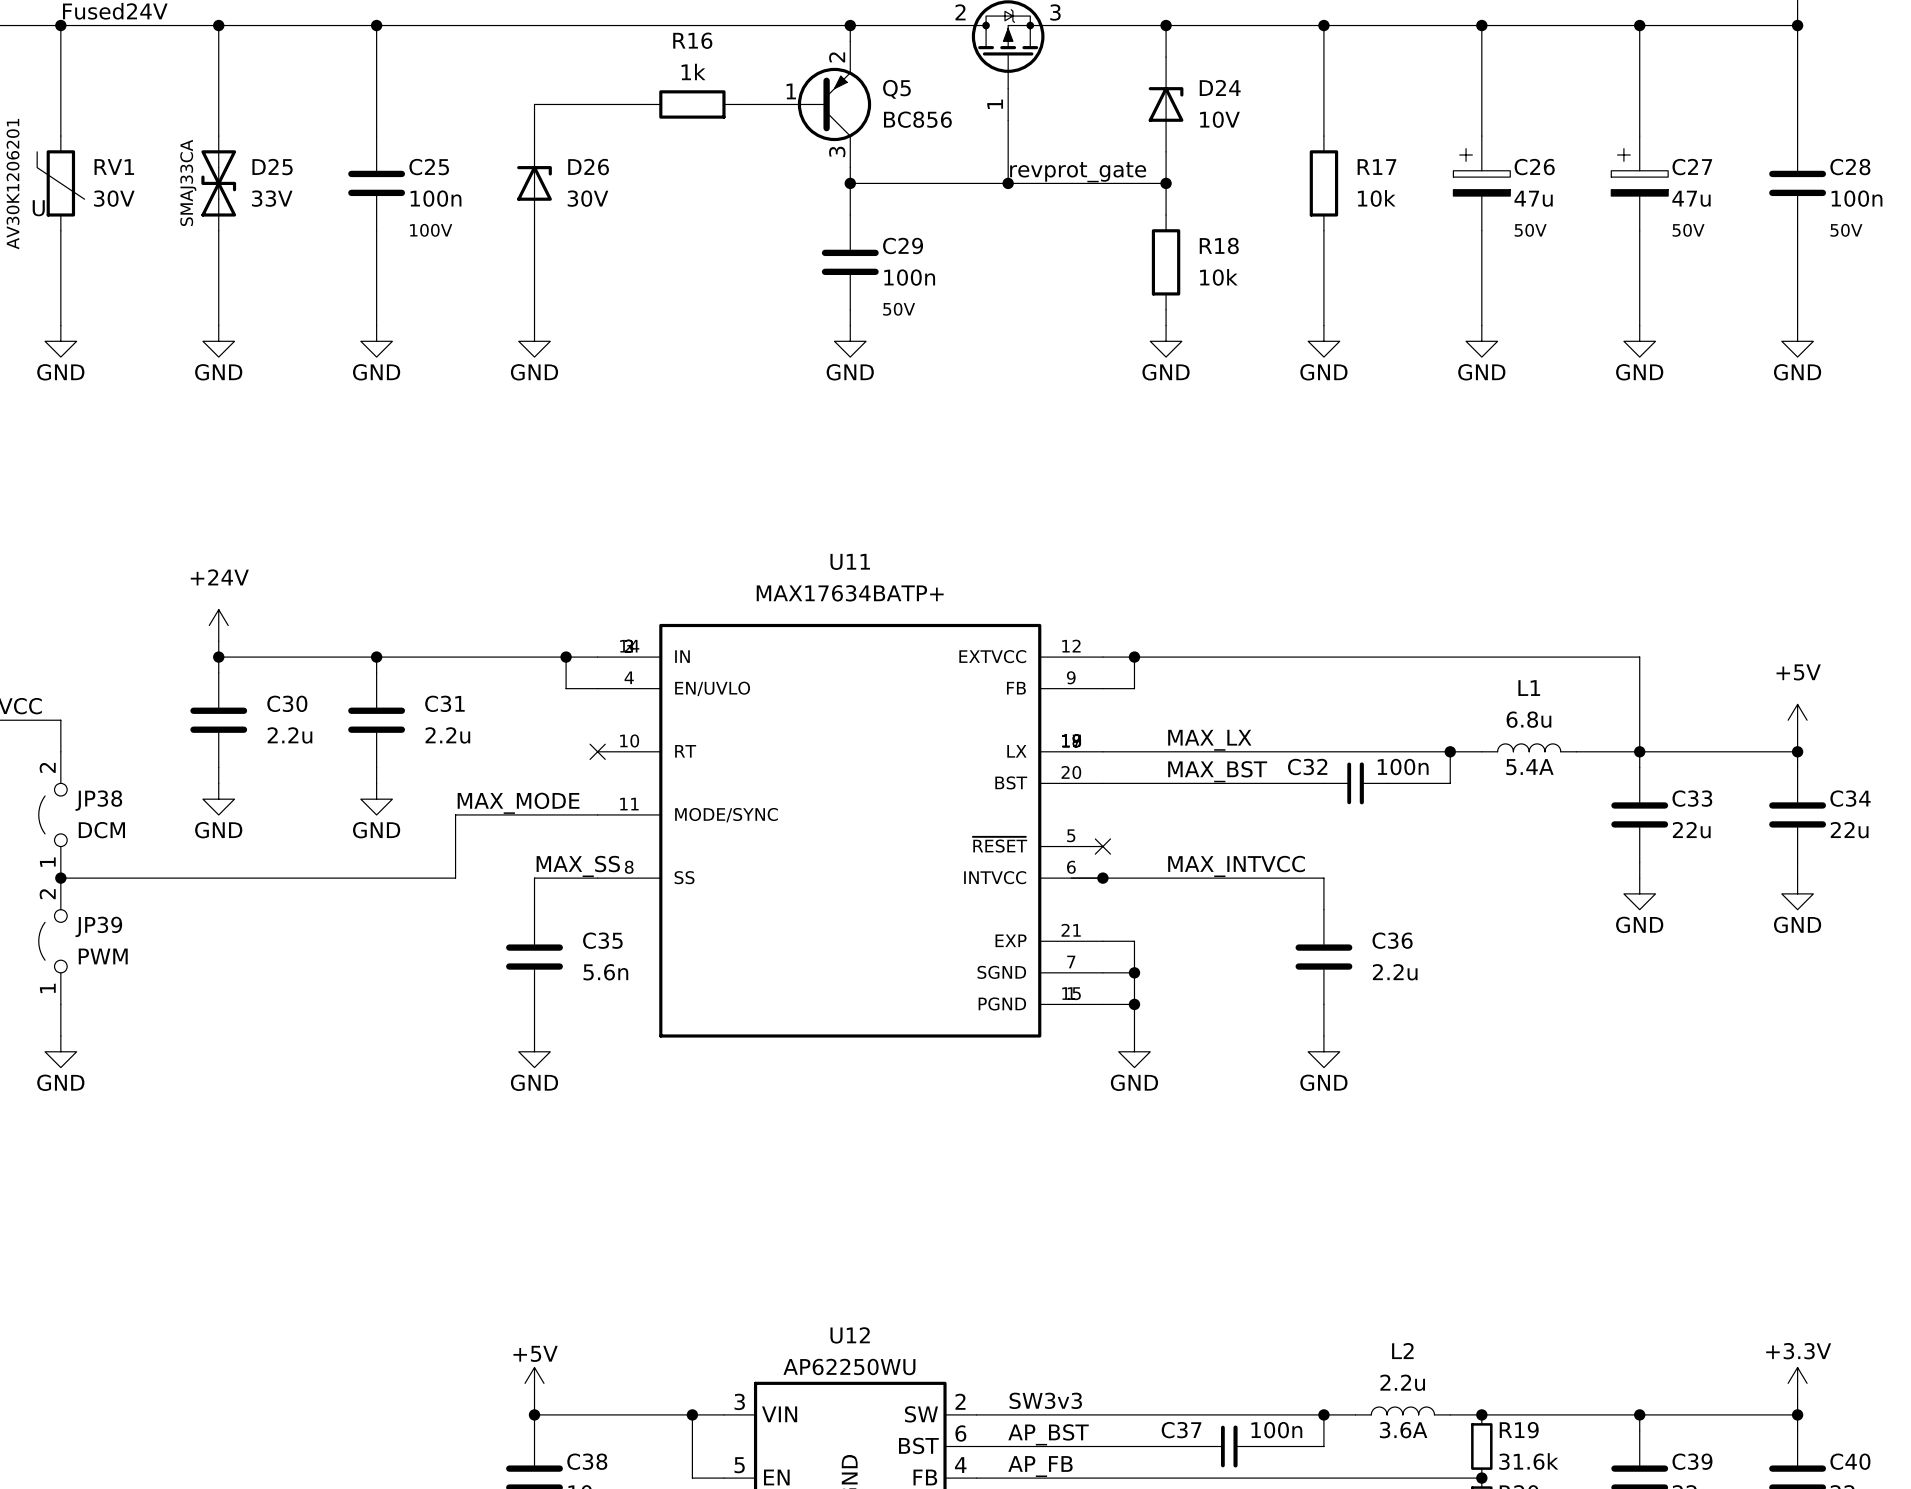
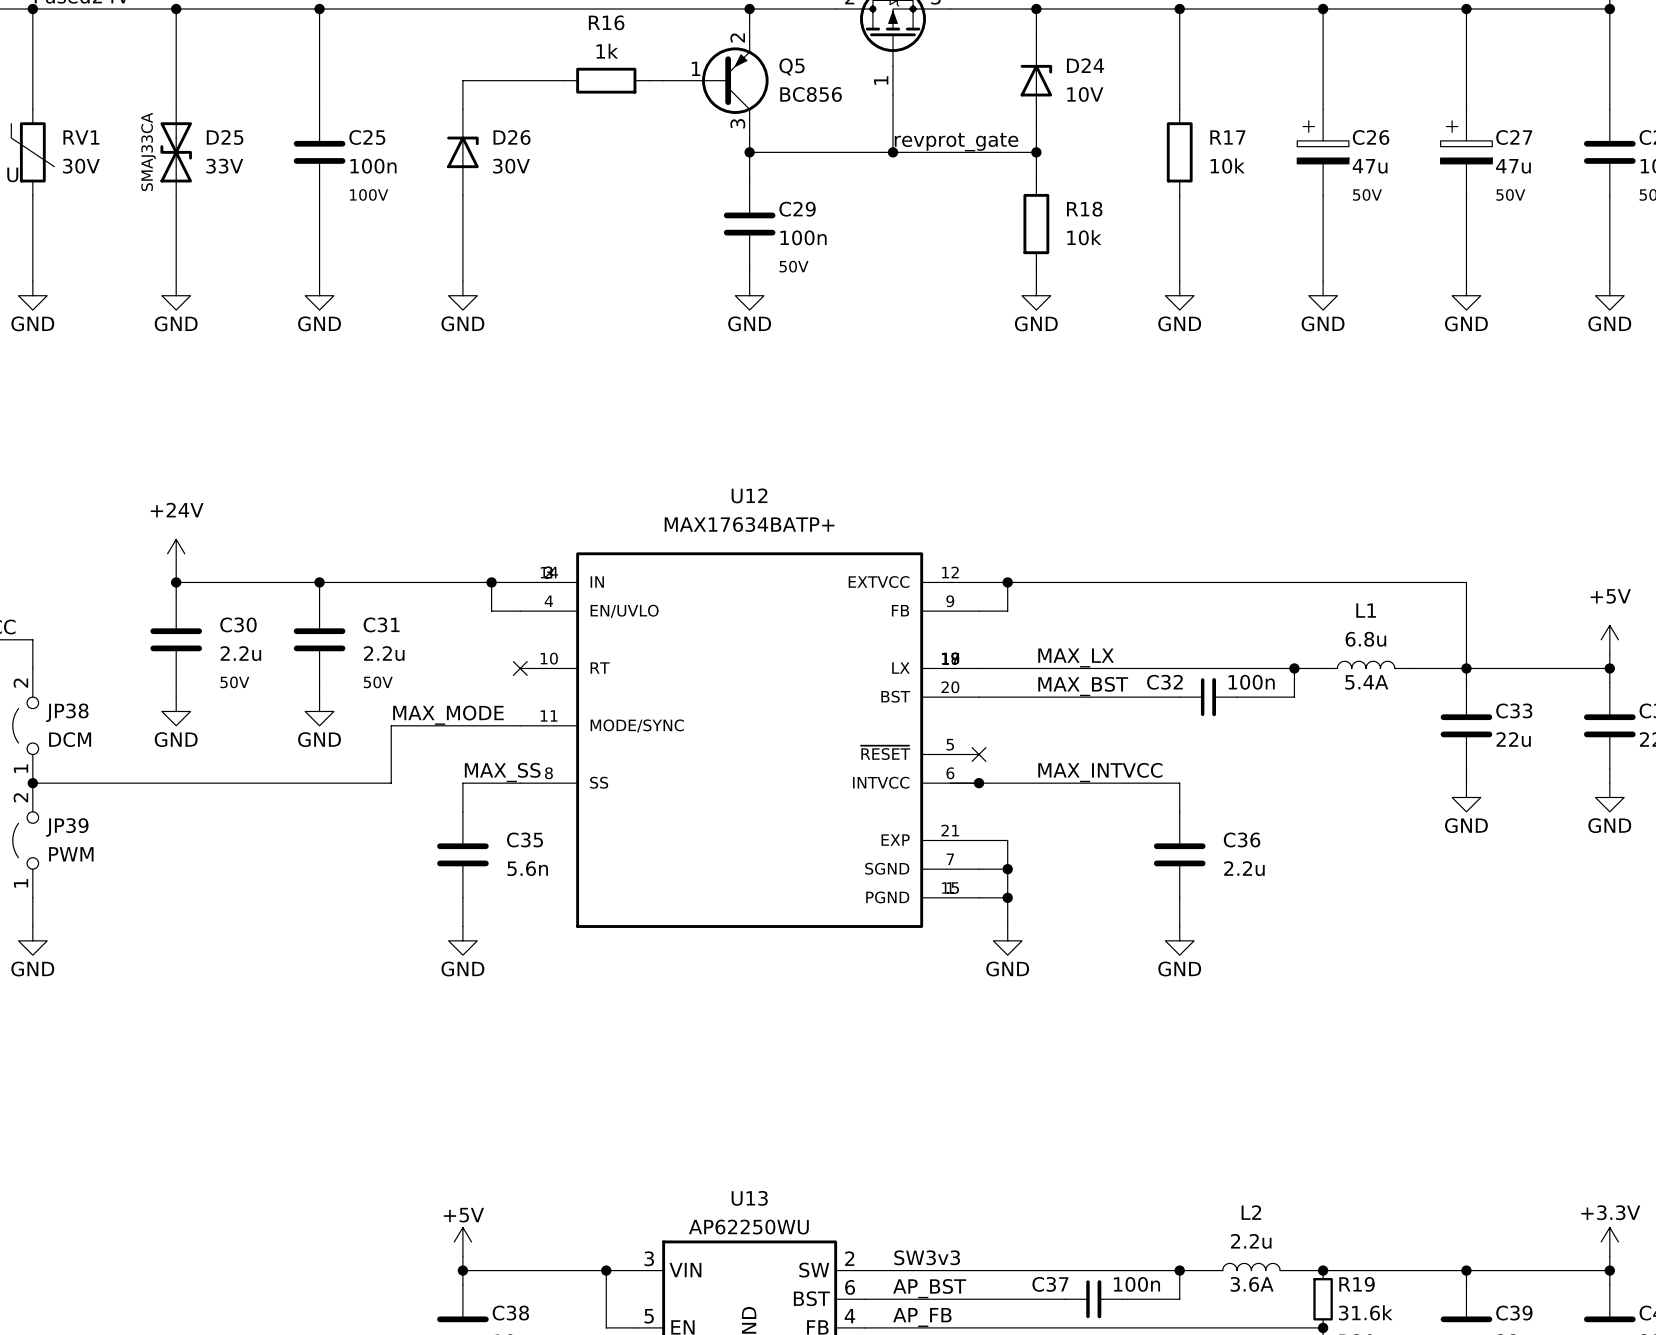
U11 name: U11 (850, 561) -> U12 (749, 495)
C30 text: none -> 50V (234, 682)
C31 text: none -> 50V (378, 682)
U12 name: U12 (850, 1335) -> U13 (749, 1198)

